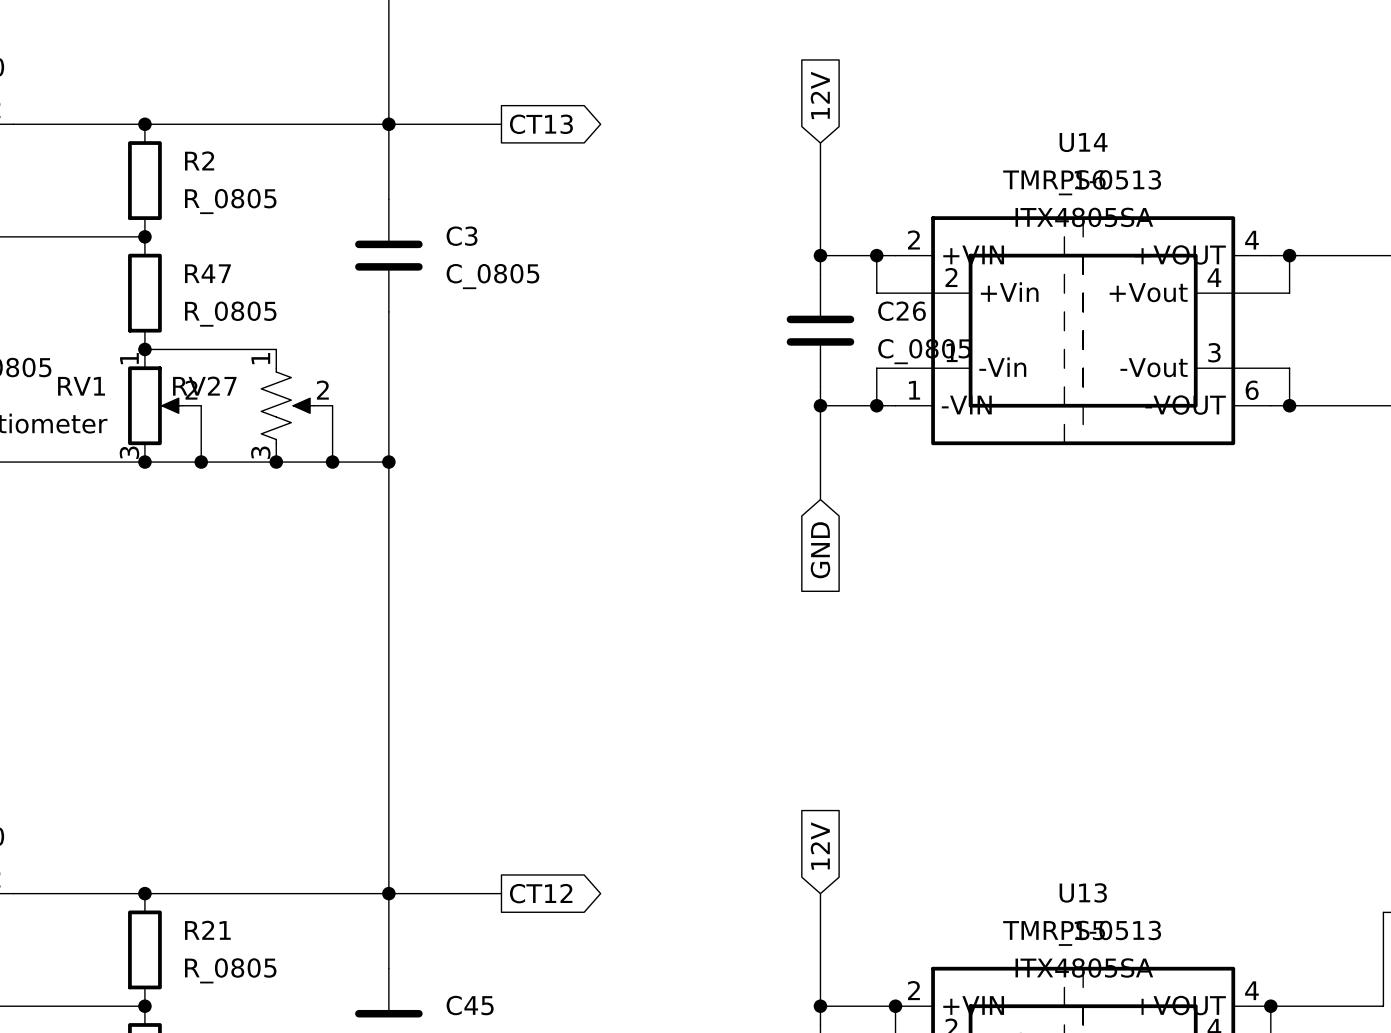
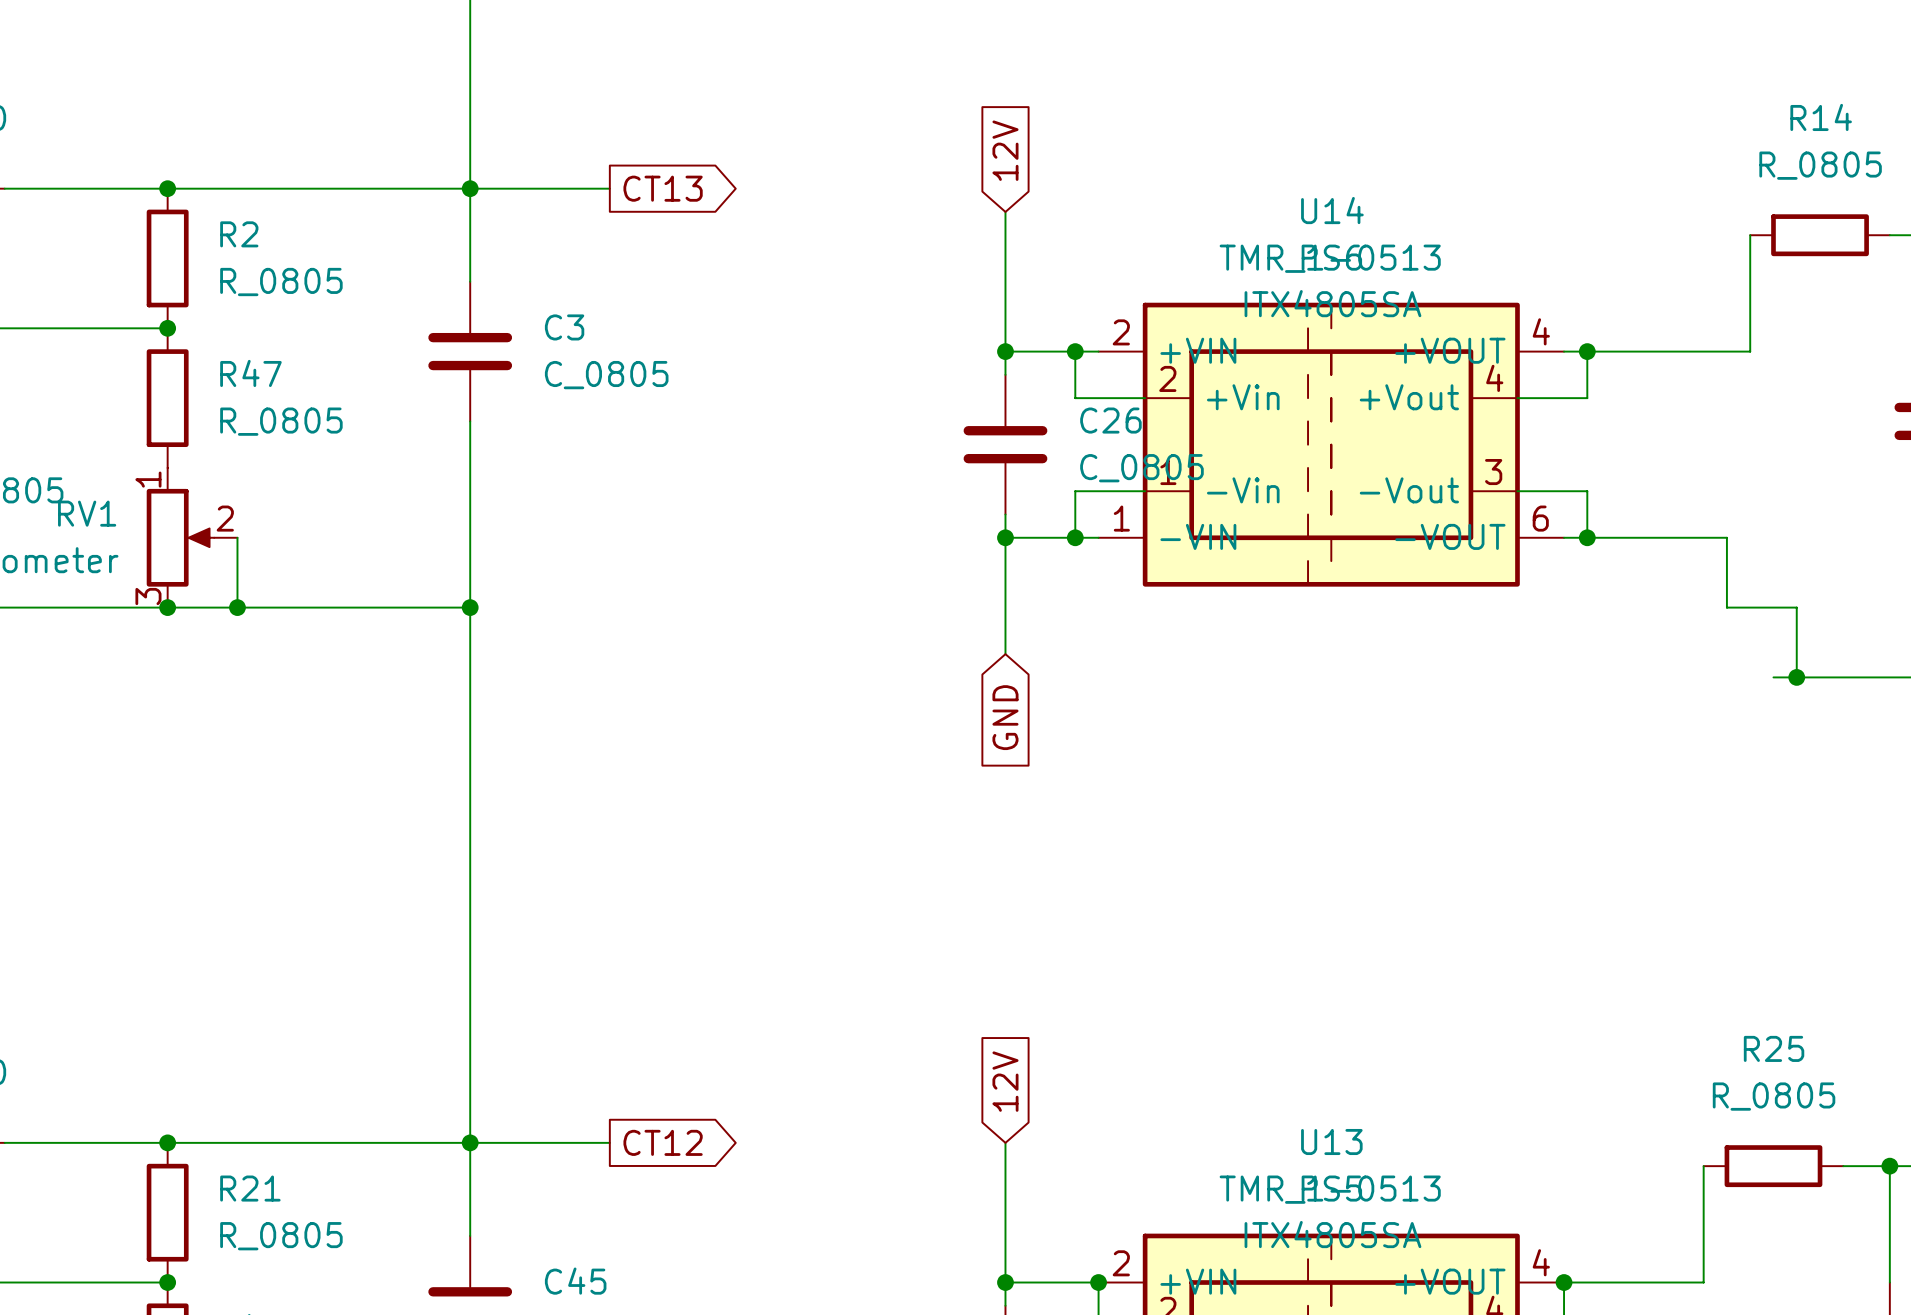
wire: (144, 349) (276, 349) -> none
junction: (144, 349) -> none
RV27: (296, 405) -> none
wire: (332, 405) (332, 462) -> none
junction: (276, 462) -> none
junction: (332, 462) -> none

